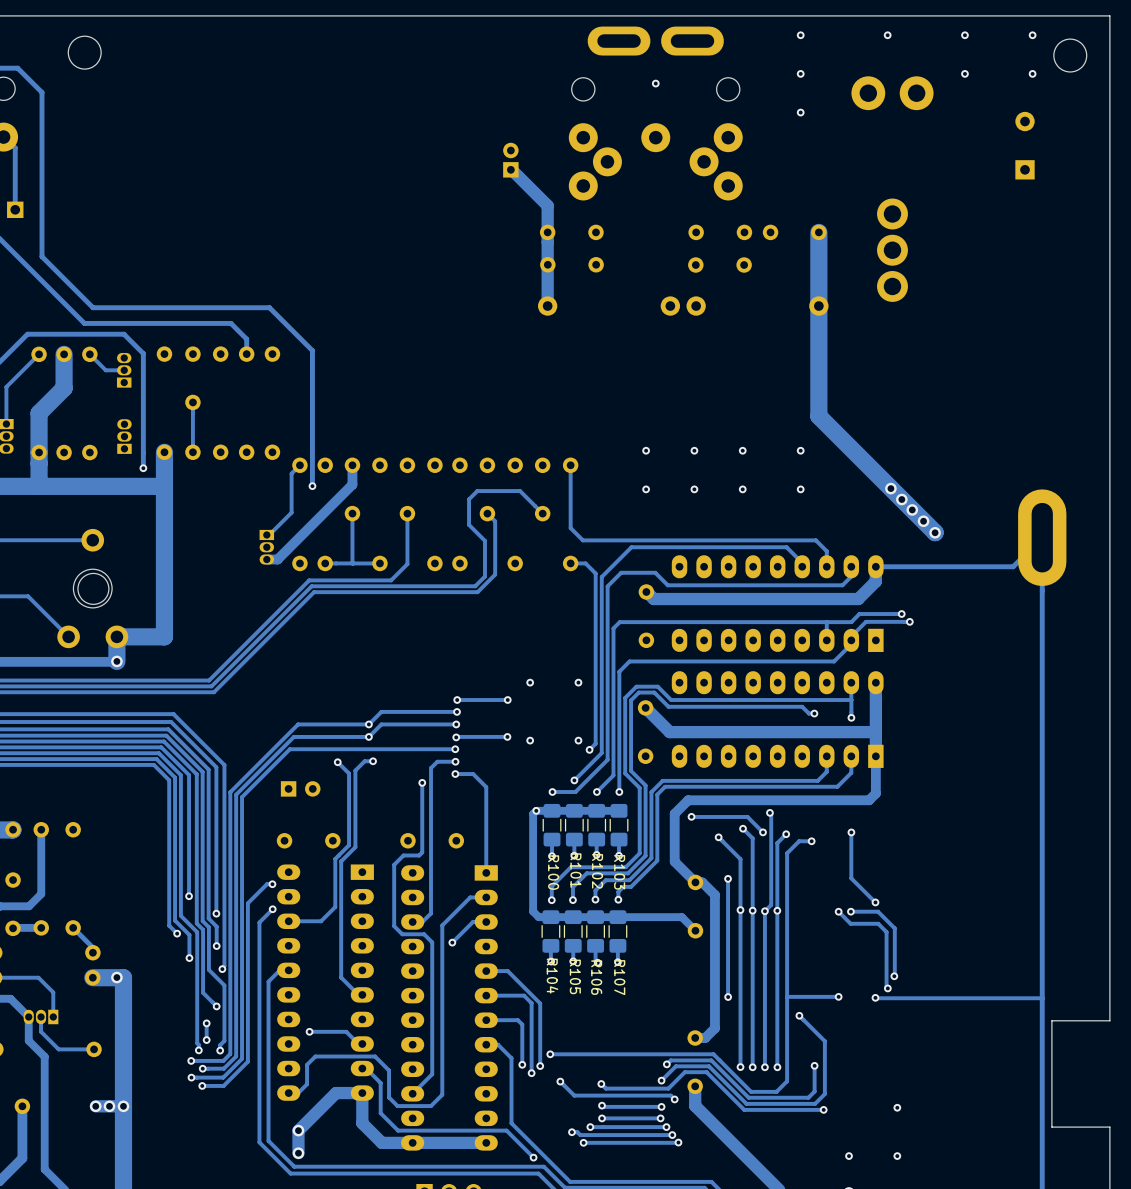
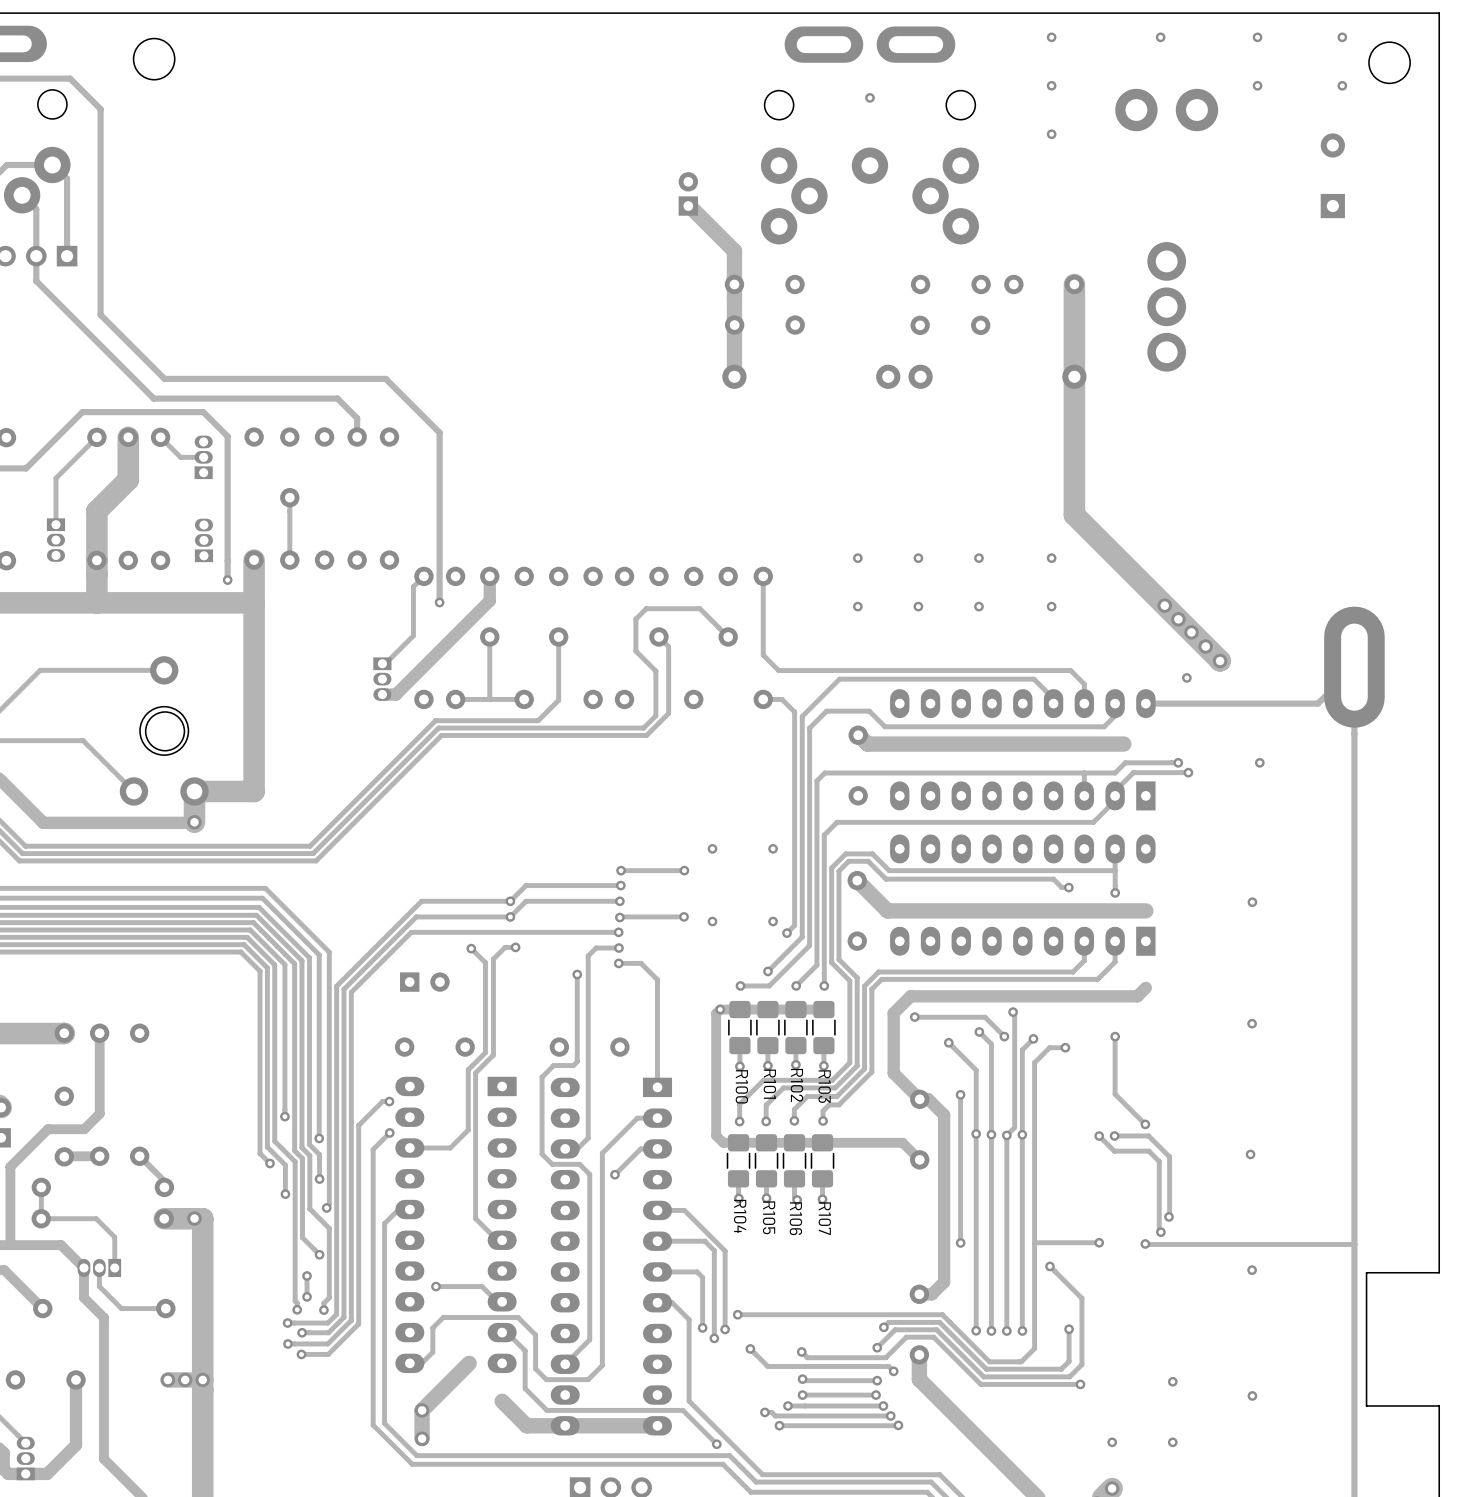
via: none -> (1186, 677)
track: (875, 566) (875, 581) (858, 599) -> none
via: none -> (1259, 762)
track: (875, 682) (875, 793) -> none
via: none -> (1252, 902)
via: none -> (1252, 1023)
via: none -> (1250, 1154)
via: none -> (1252, 1270)
track: (336, 1093) (362, 1093) (362, 1123) -> none
via: none -> (1252, 1395)

